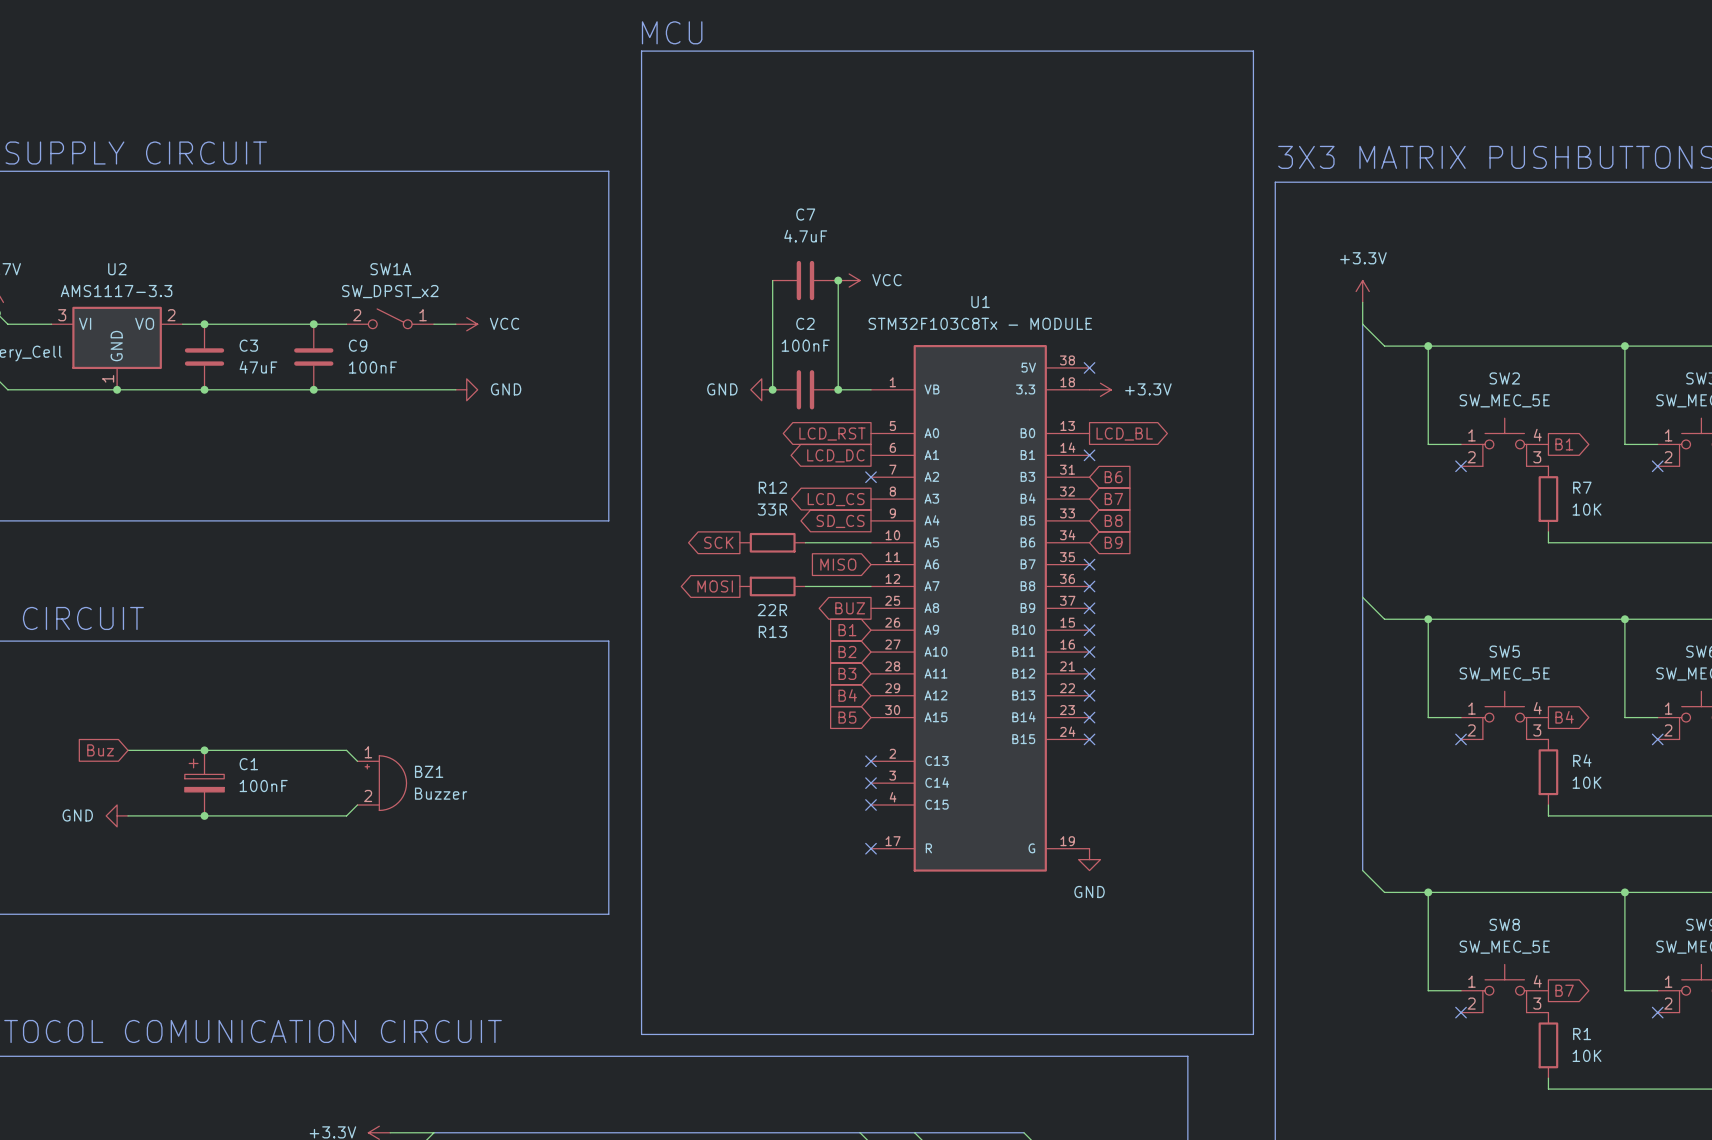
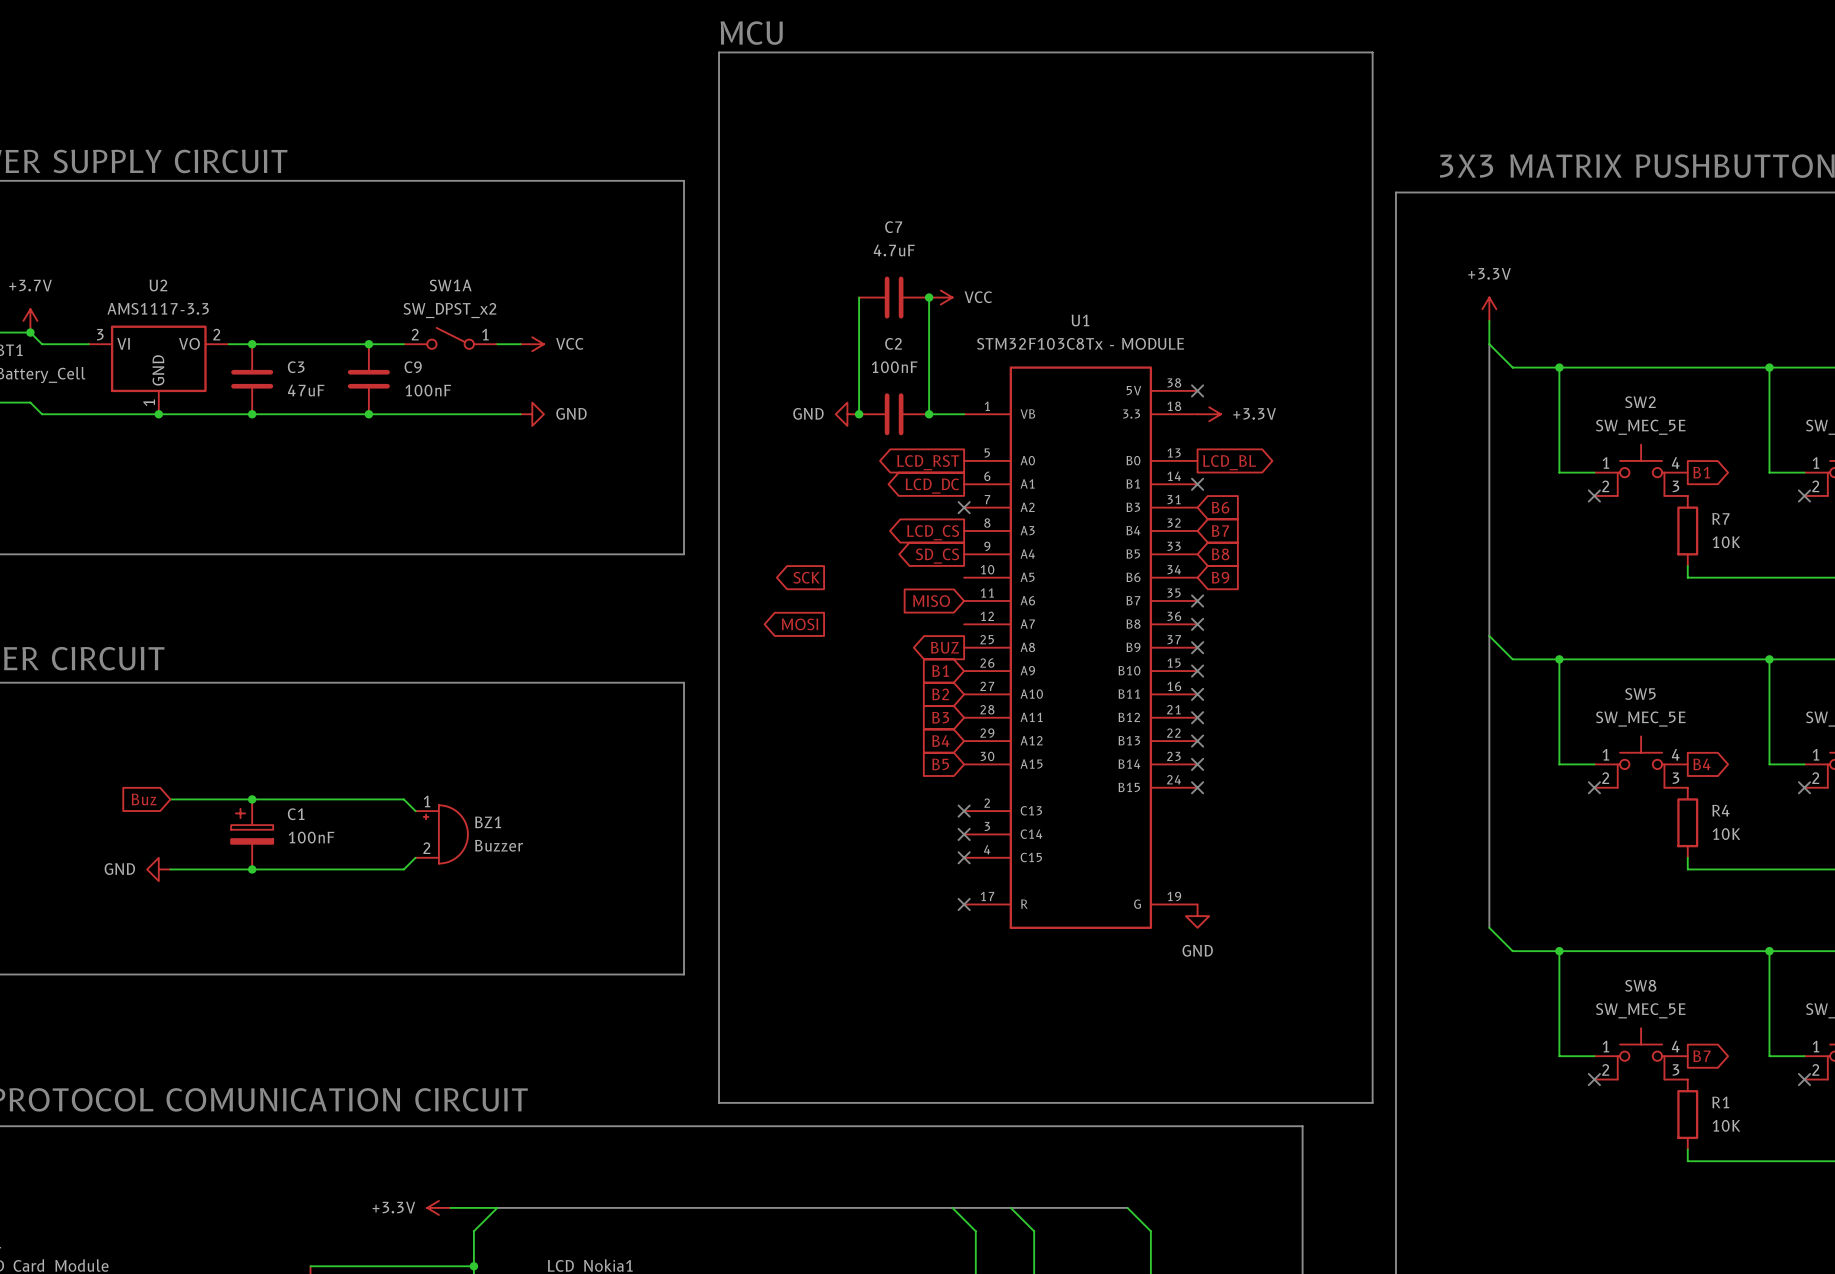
R12: 33R (772, 542) -> none
wire: (805, 542) (871, 542) -> none
R13: 22R (772, 586) -> none
wire: (805, 586) (871, 586) -> none

